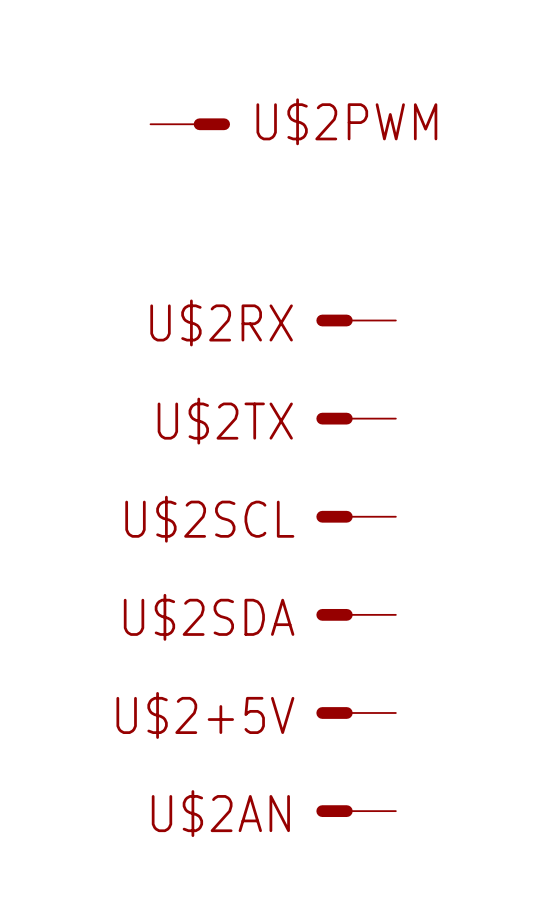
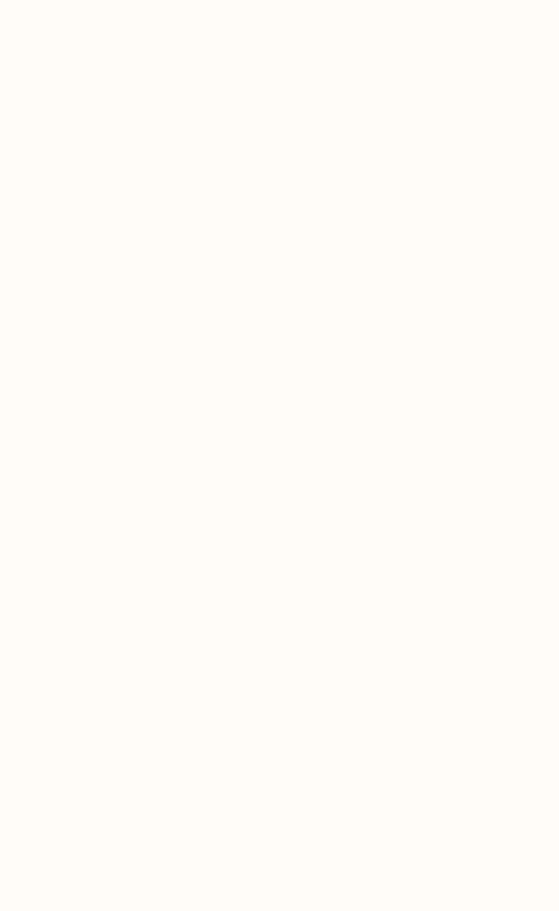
U$2PWM: (190, 124) -> none
U$2RX: (356, 320) -> none
U$2TX: (356, 418) -> none
U$2SCL: (356, 516) -> none
U$2SDA: (356, 614) -> none
U$2+5V: (356, 712) -> none
U$2AN: (356, 811) -> none

